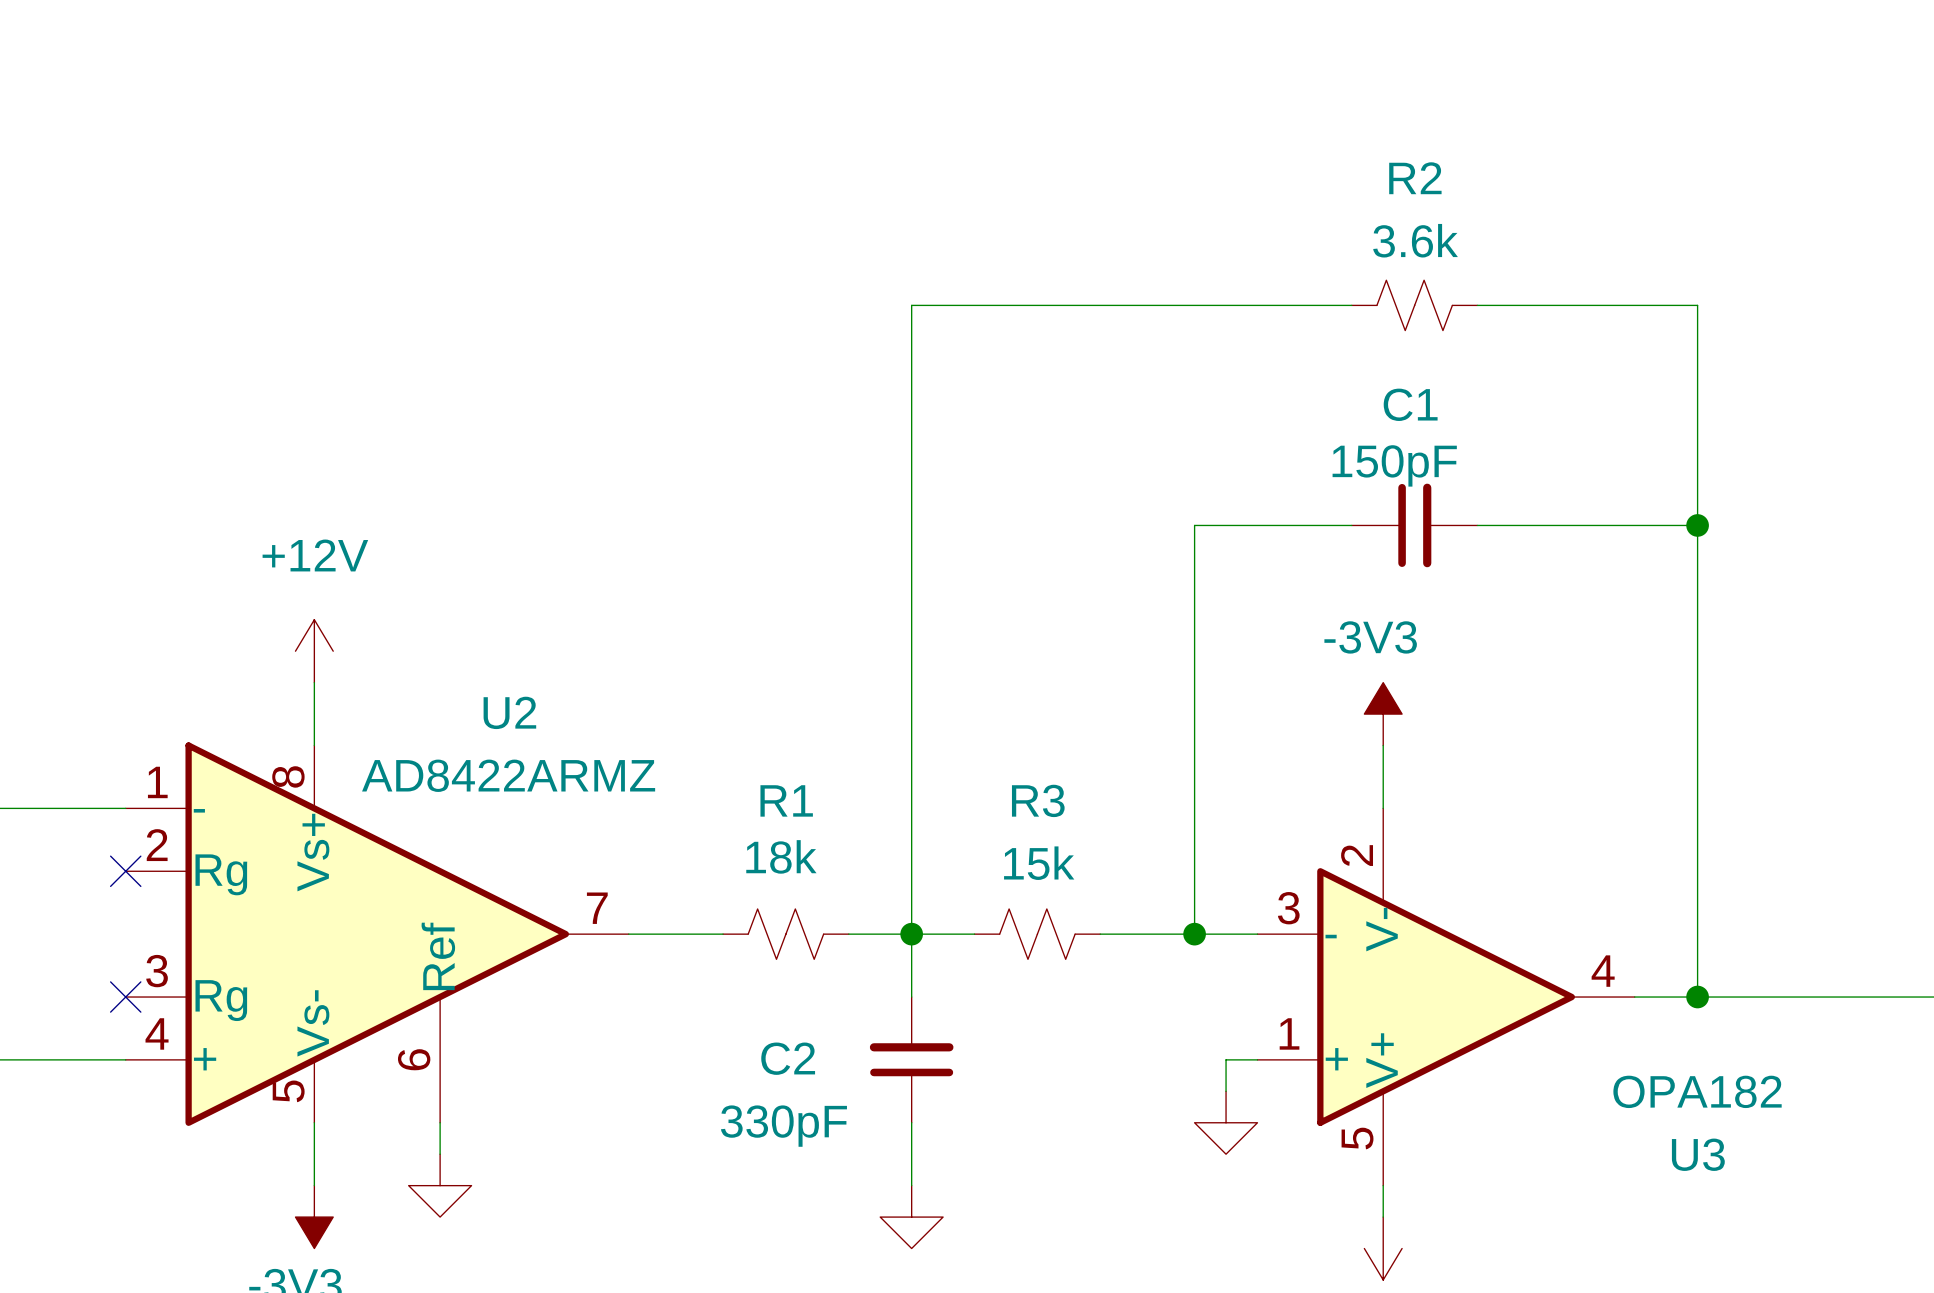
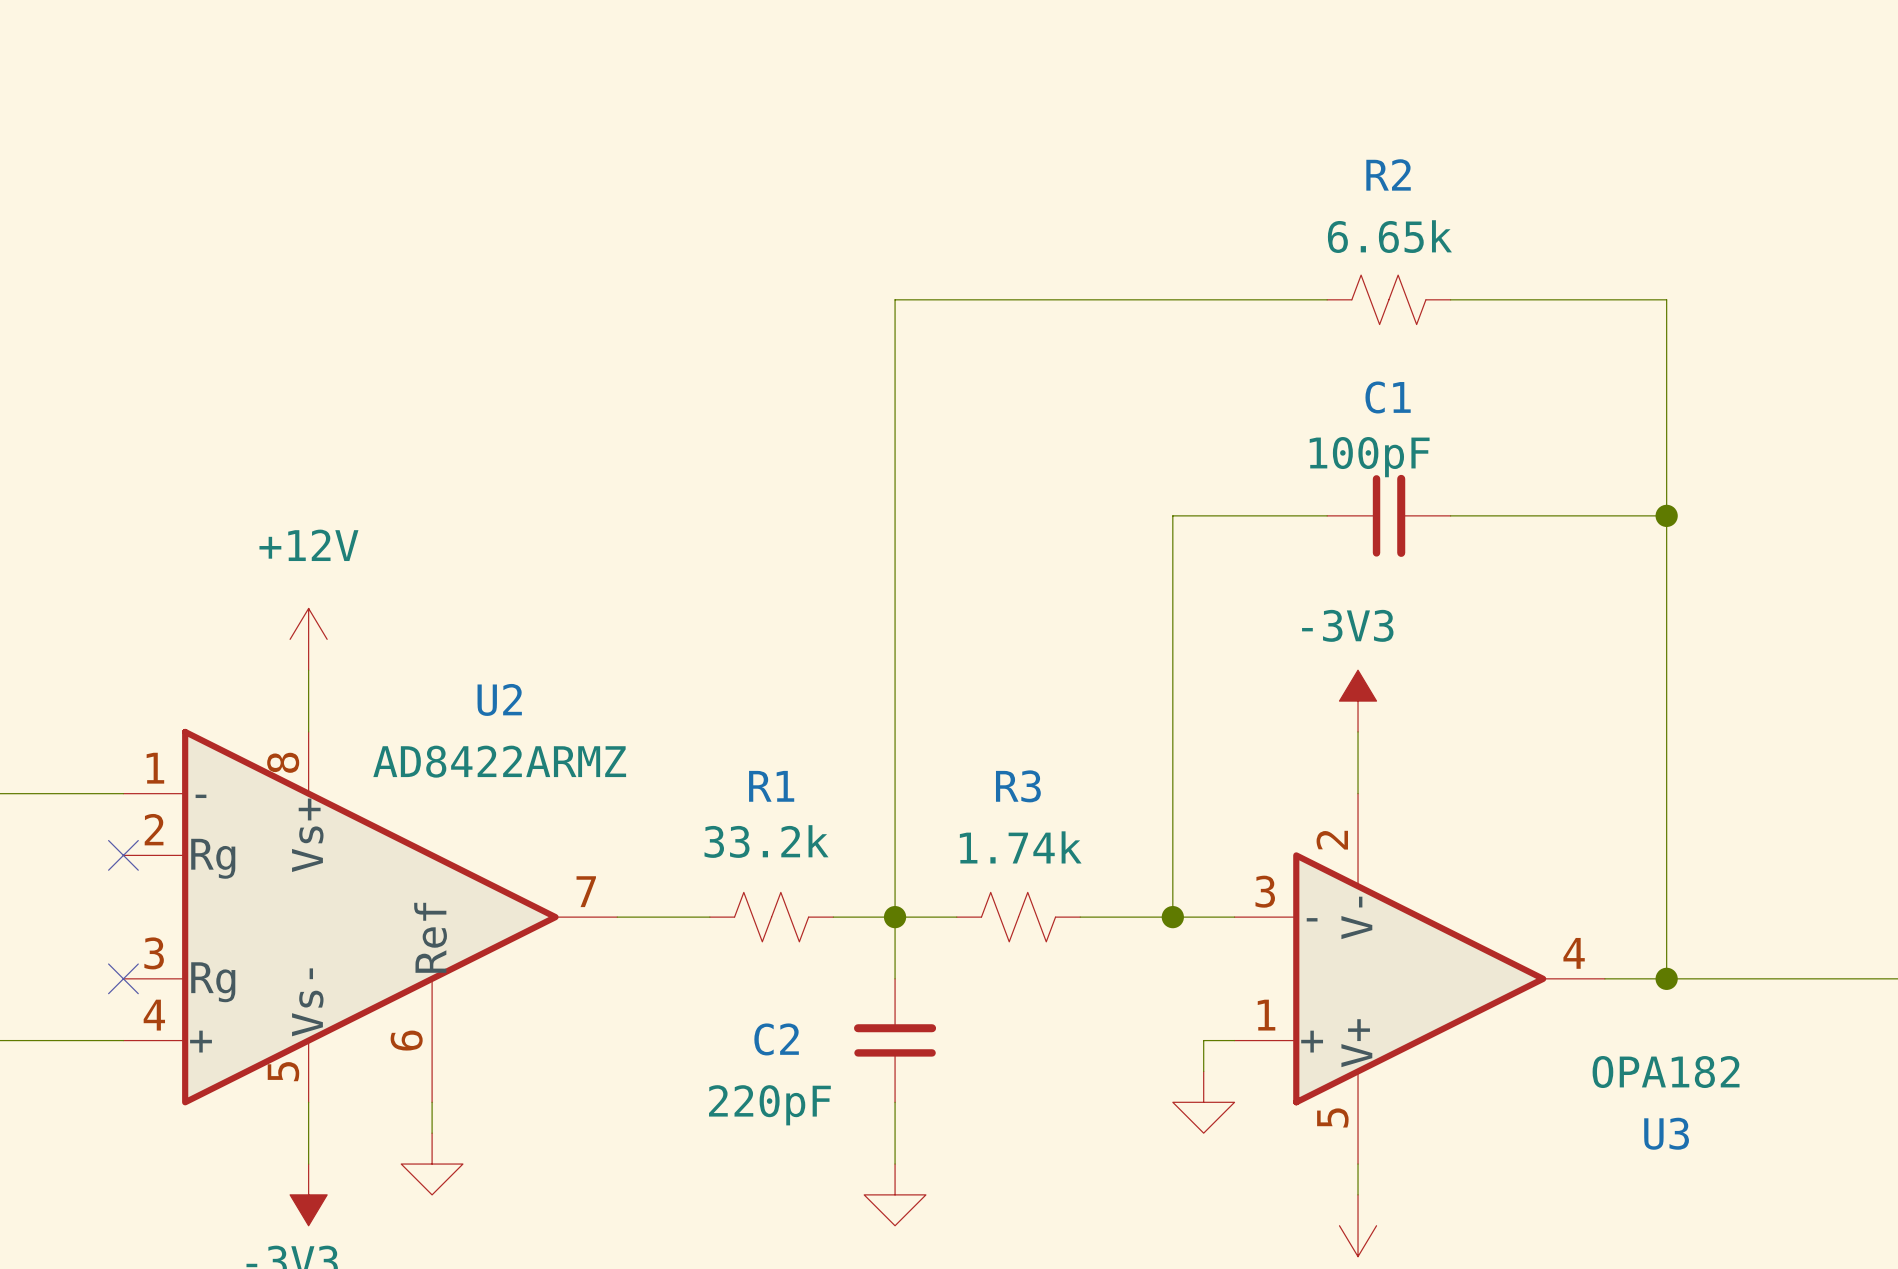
R2 value: 3.6k (1415, 240) -> 6.65k (1389, 236)
C1 value: 150pF (1394, 465) -> 100pF (1369, 457)
R1 value: 18k (781, 856) -> 33.2k (766, 841)
R3 value: 15k (1039, 863) -> 1.74k (1020, 847)
C2 value: 330pF (783, 1126) -> 220pF (769, 1105)

